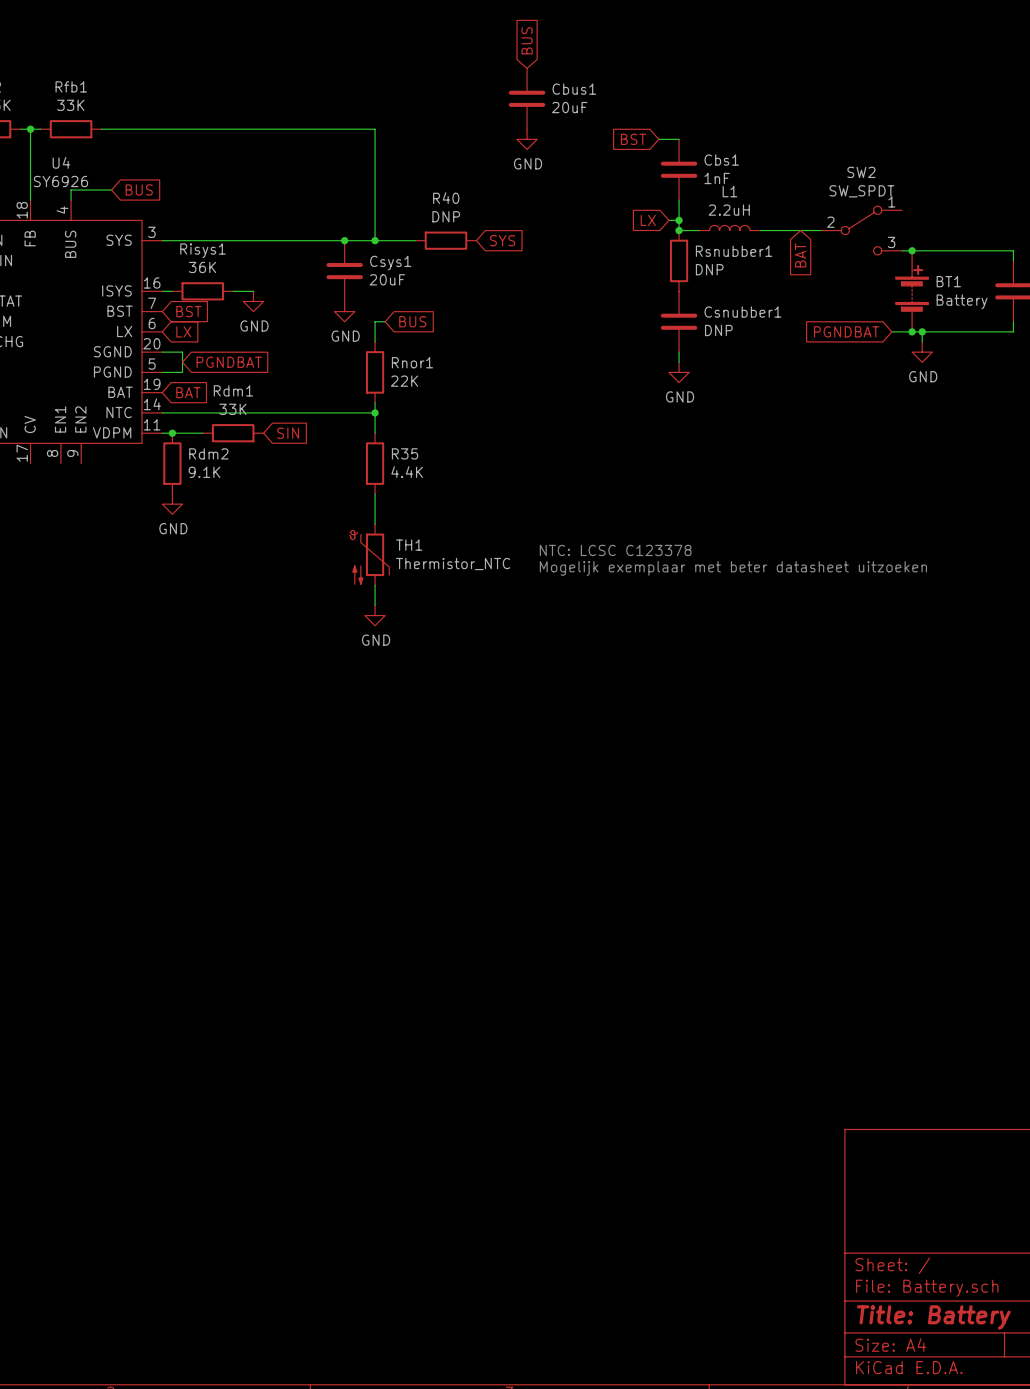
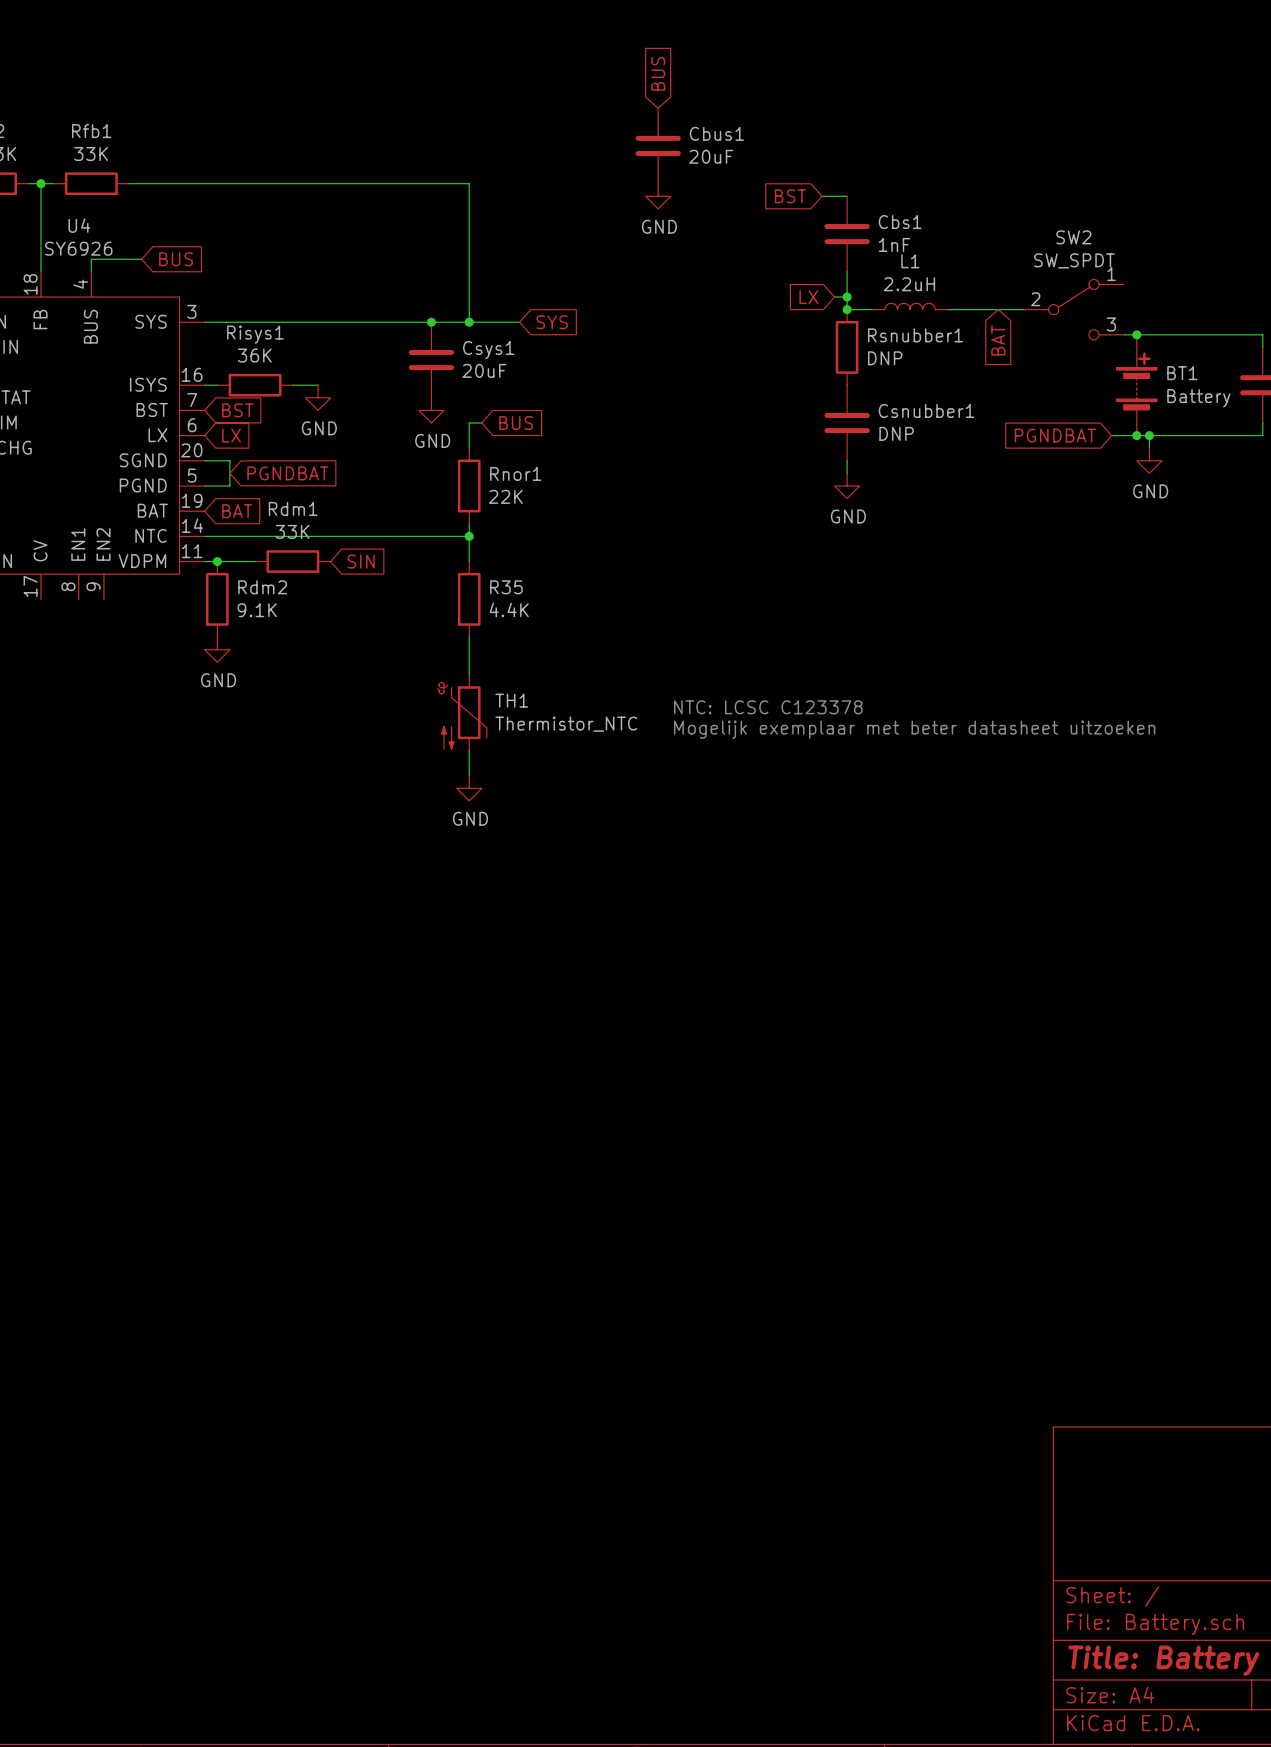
R40: DNP (445, 240) -> none
global label position: SYS (502, 240) -> SYS (552, 322)

